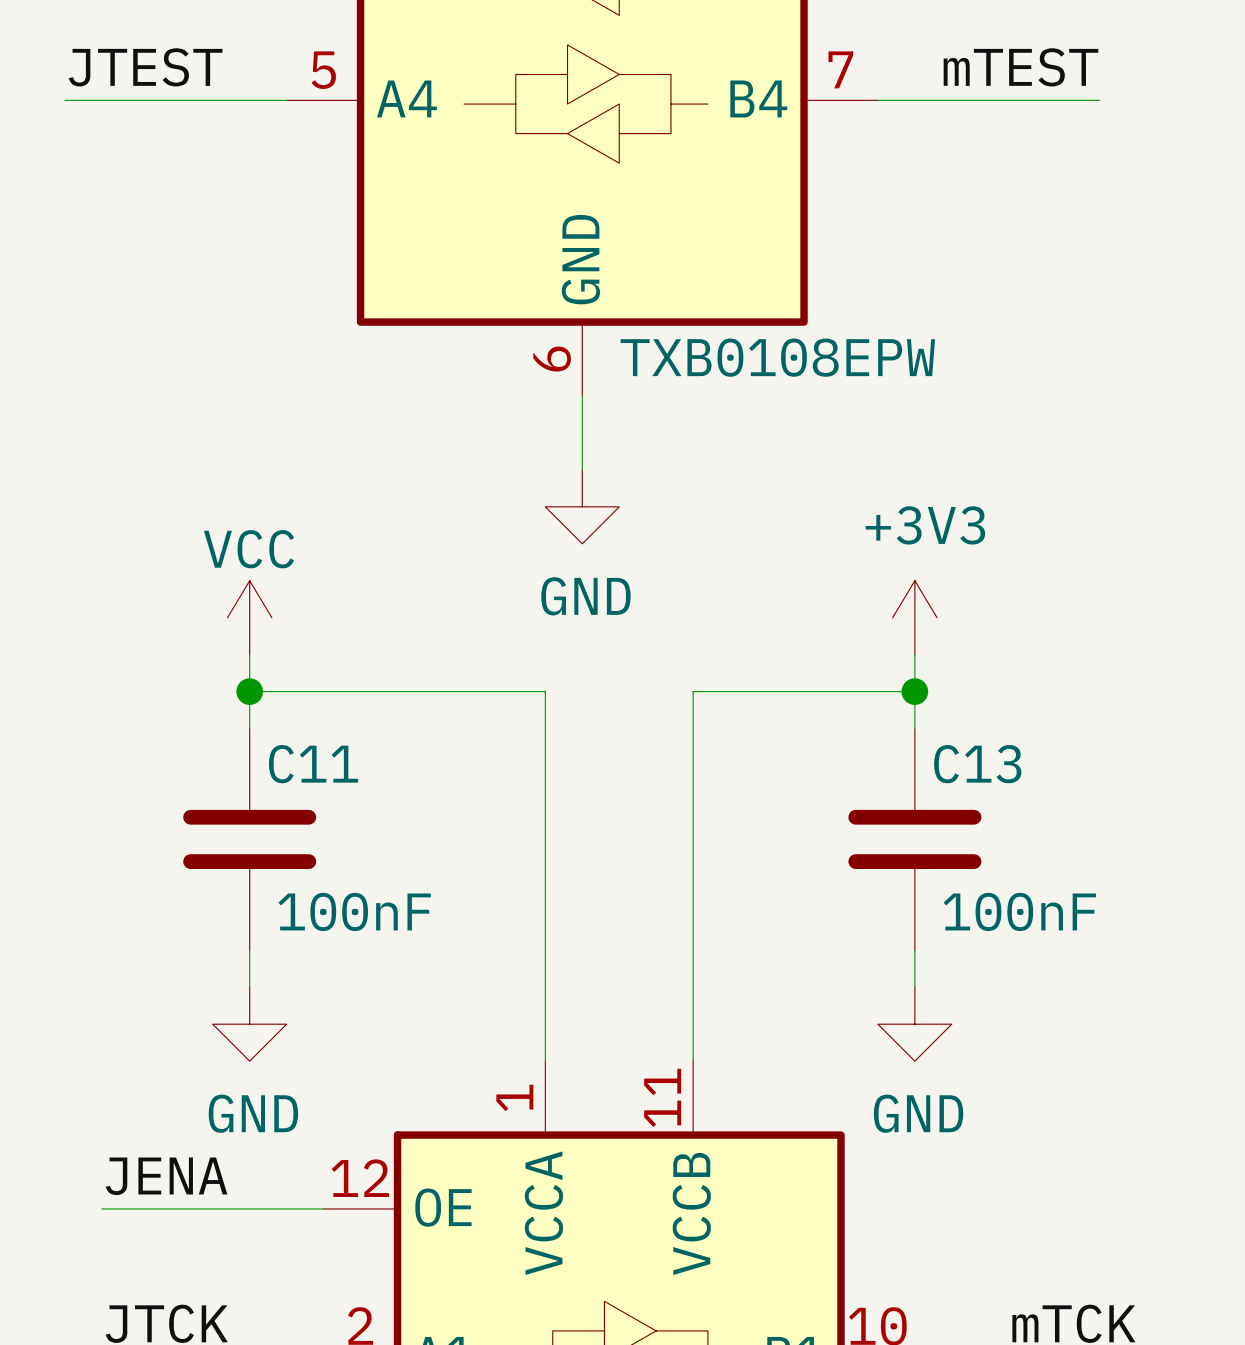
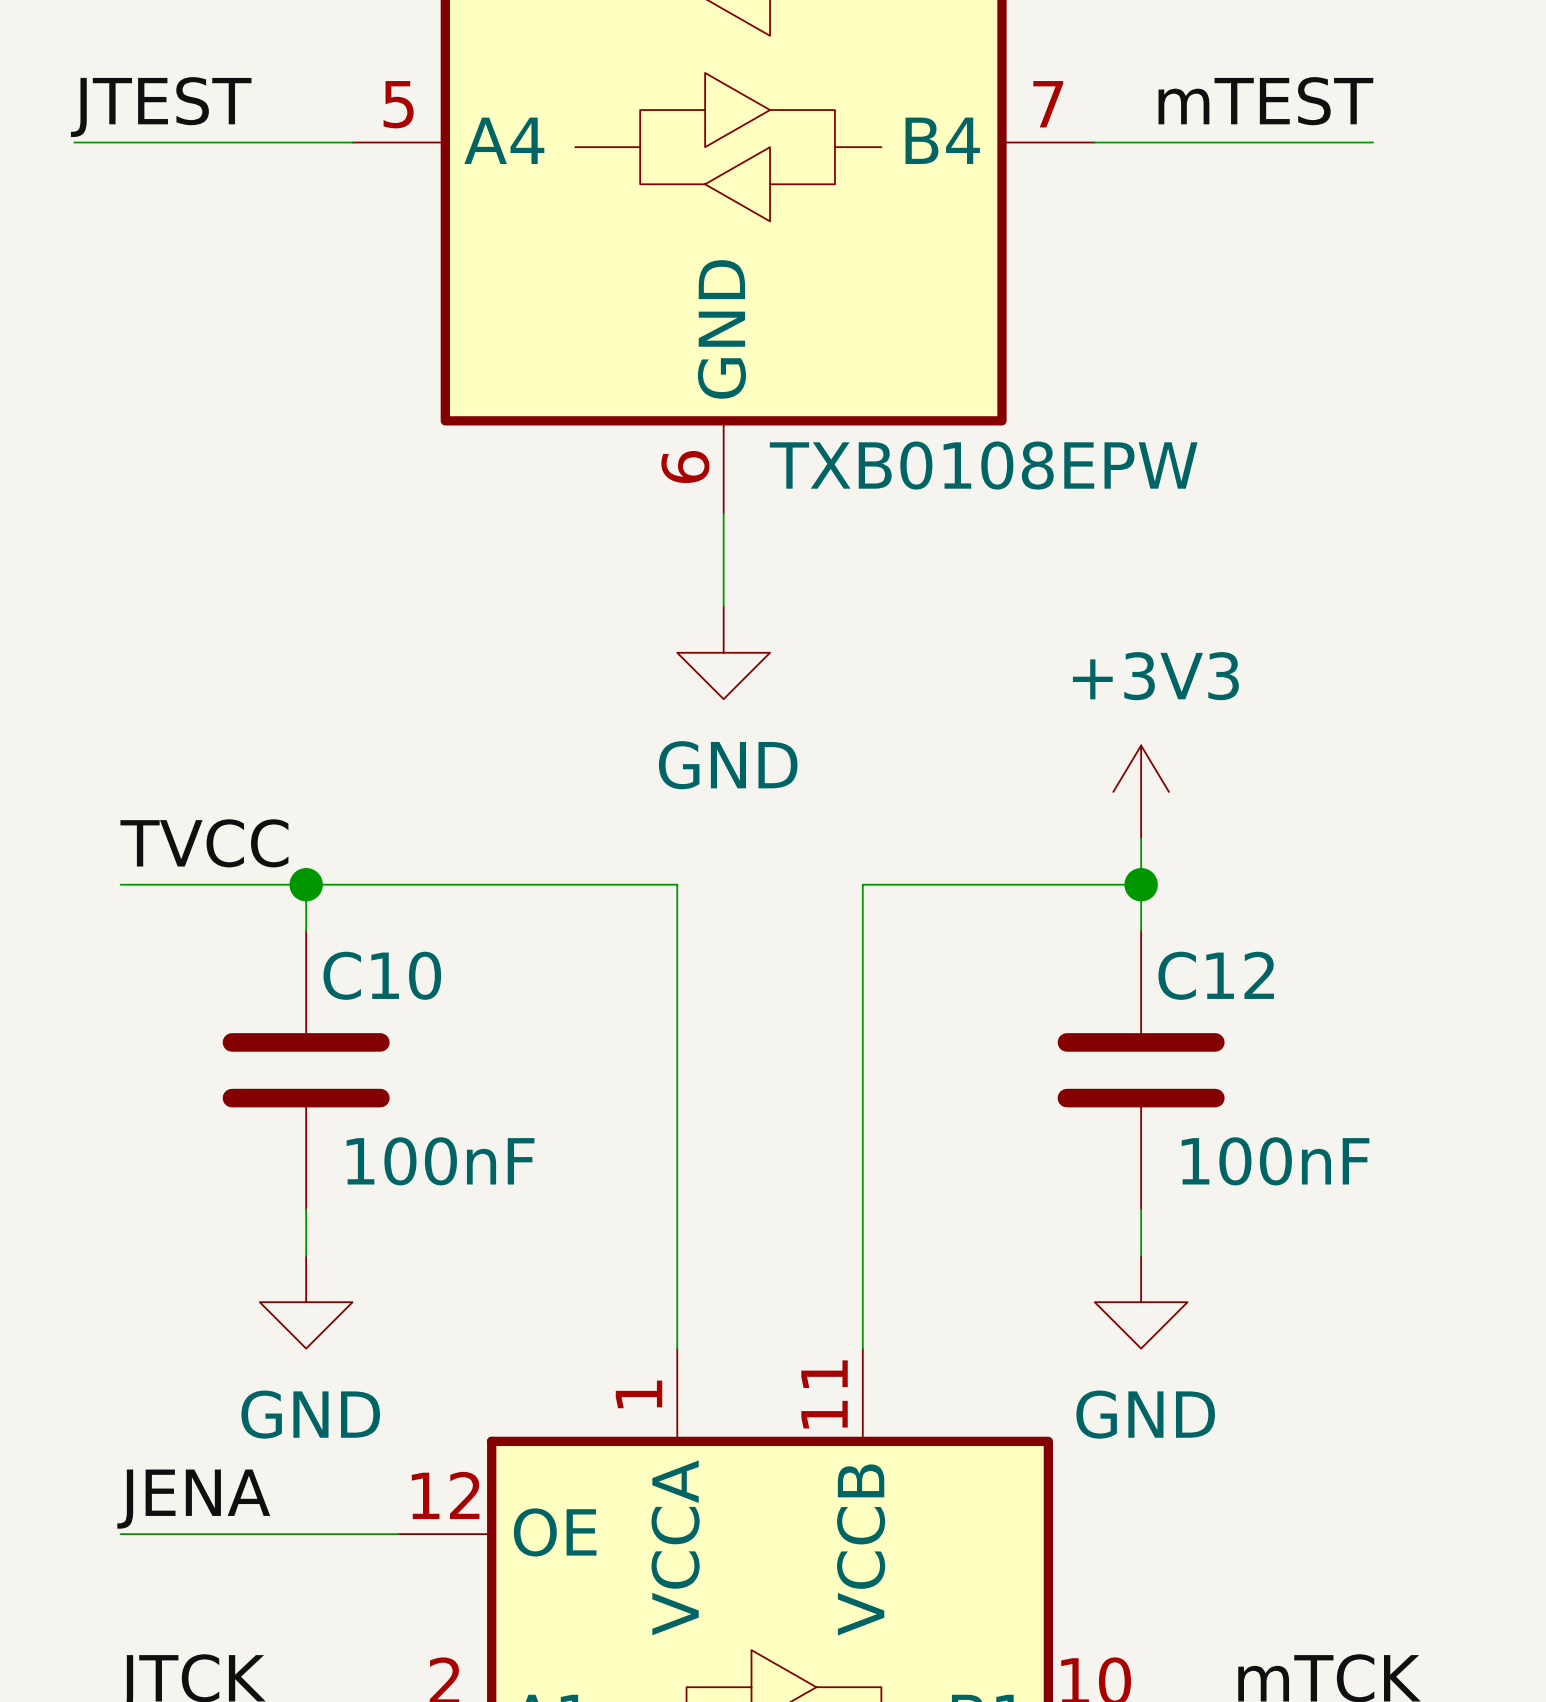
power symbol: VCC (249, 617) -> none
wire: (249, 654) (249, 691) -> (120, 884) (306, 884)
label: none -> TVCC (204, 843)
C11 name: C11 (313, 764) -> C10 (382, 975)
C13 name: C13 (977, 764) -> C12 (1216, 975)

